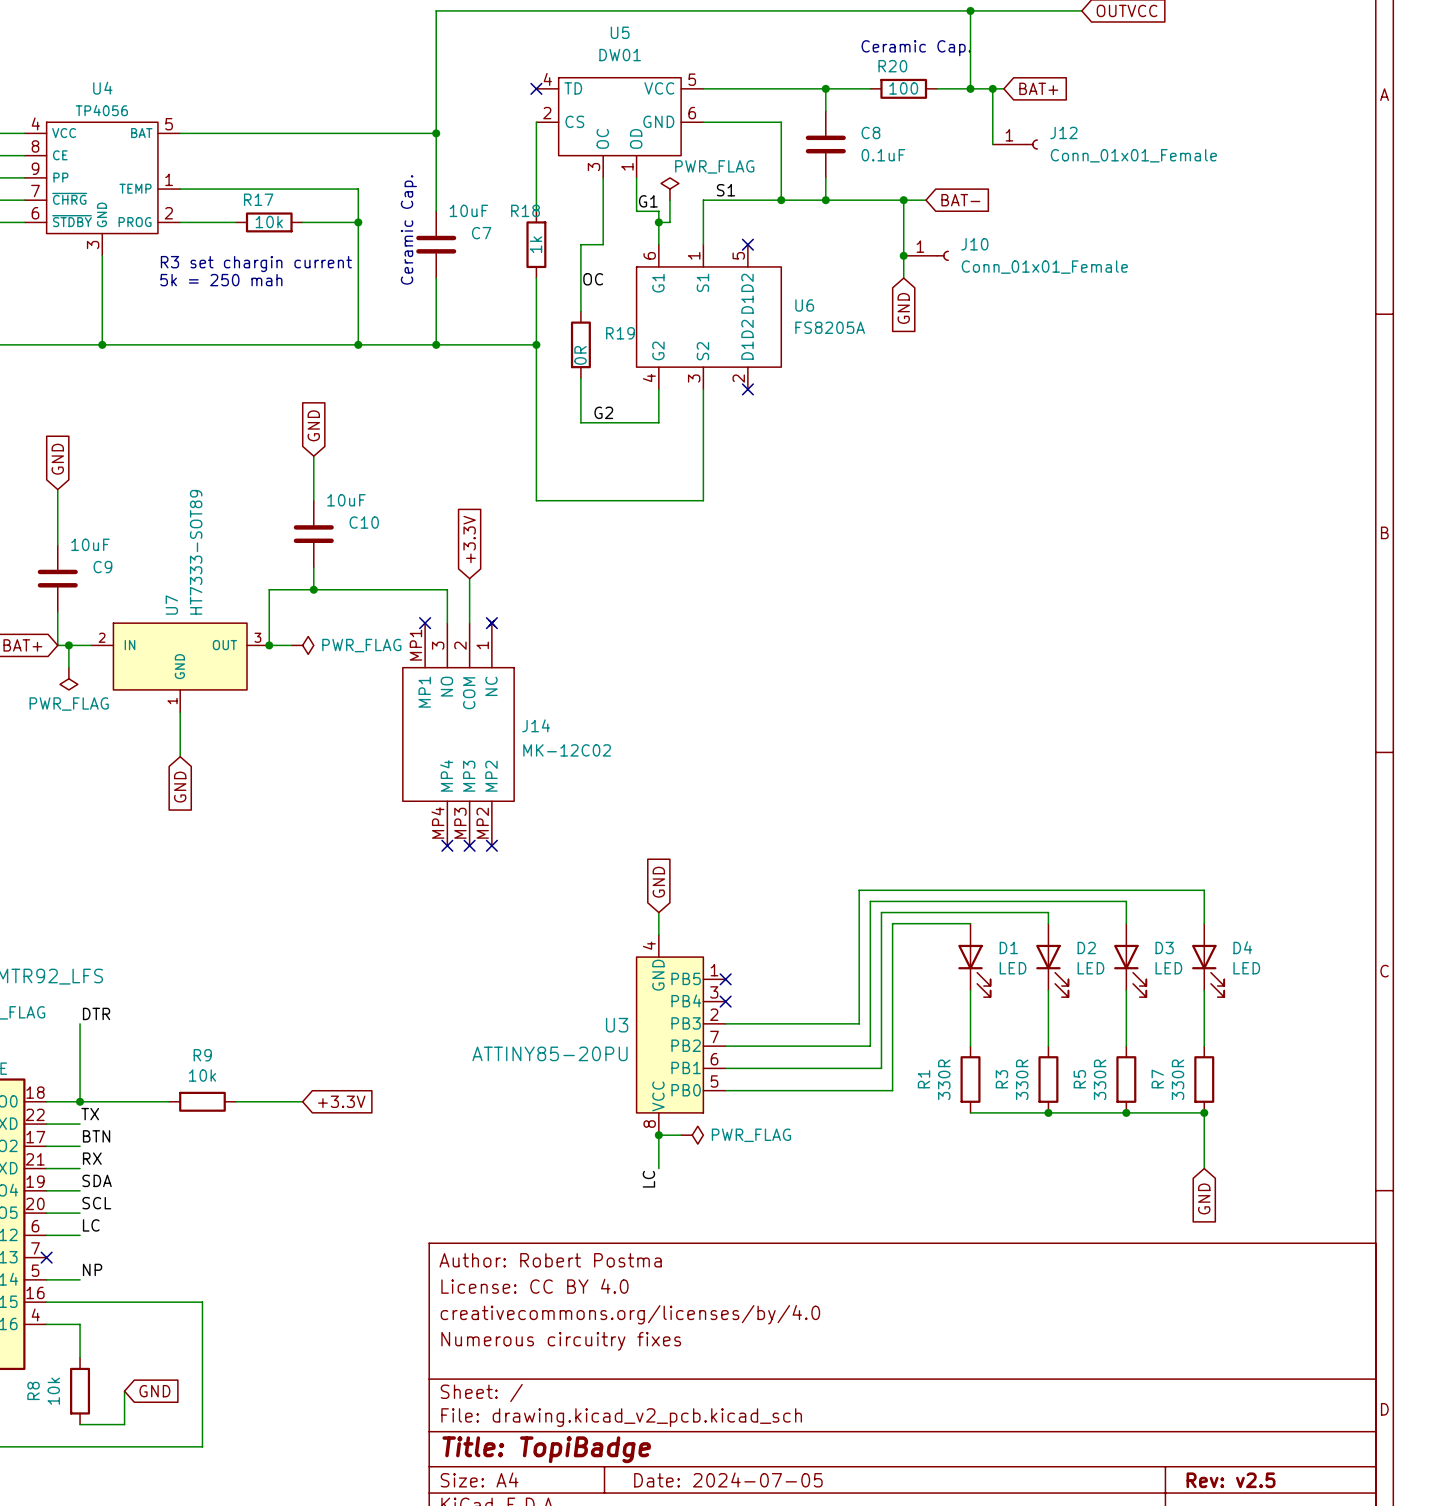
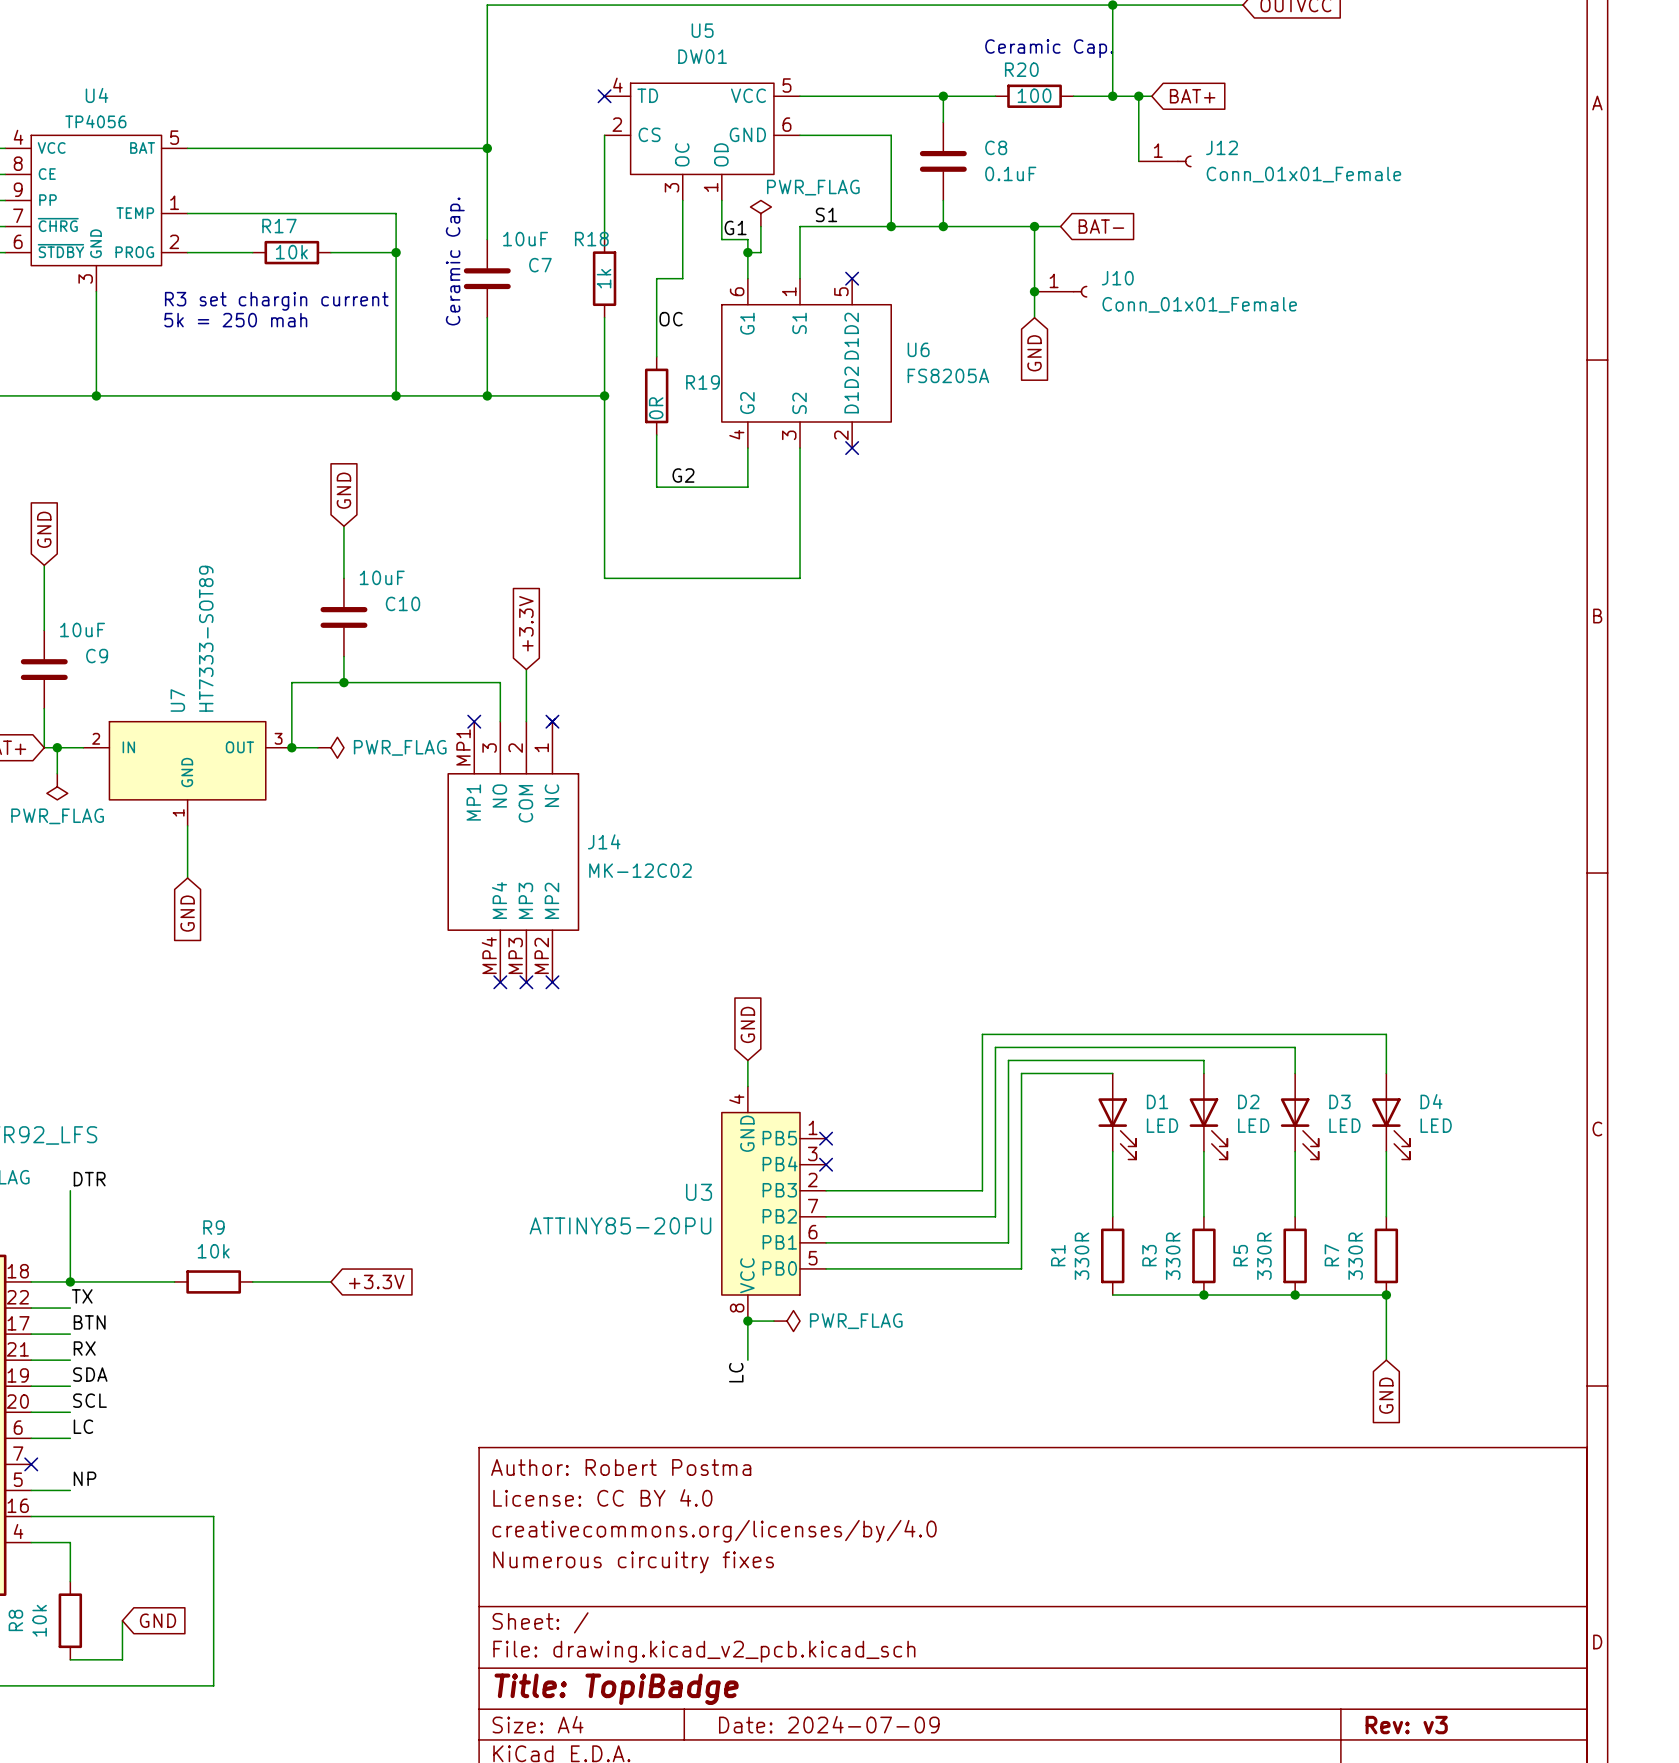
title block: Date: 2024-07-05 (728, 1479) -> Date: 2024-07-09 (829, 1724)
title block: Rev: v2.5 (1231, 1480) -> Rev: v3 (1406, 1725)

